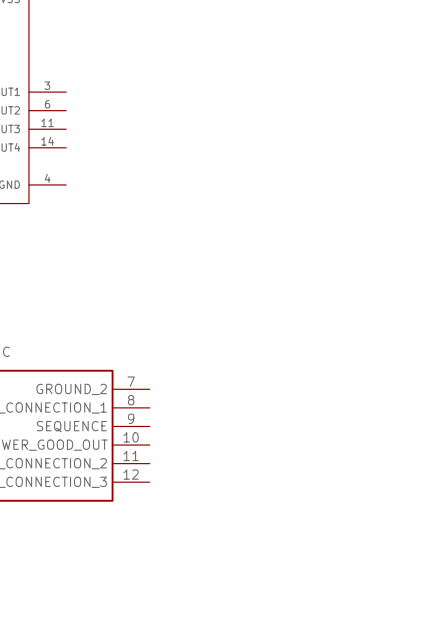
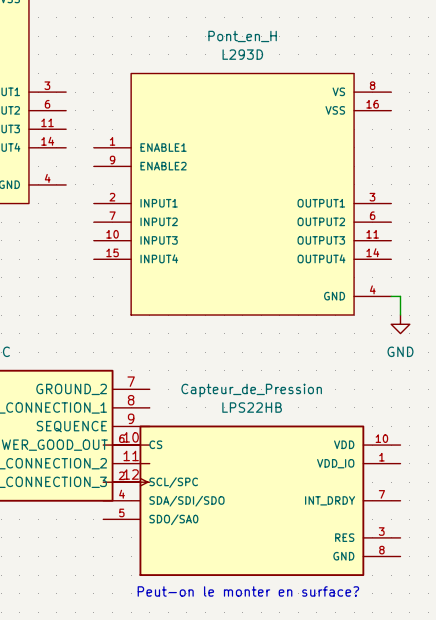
Pont_en_H: none -> L293D (242, 194)
wire: none -> (391, 296) (400, 296) (400, 315)
power symbol: none -> GND (400, 324)
Capteur_de_Pression: none -> LPS22HB (251, 500)
text: none -> Peut-on le monter en surface? (248, 591)

